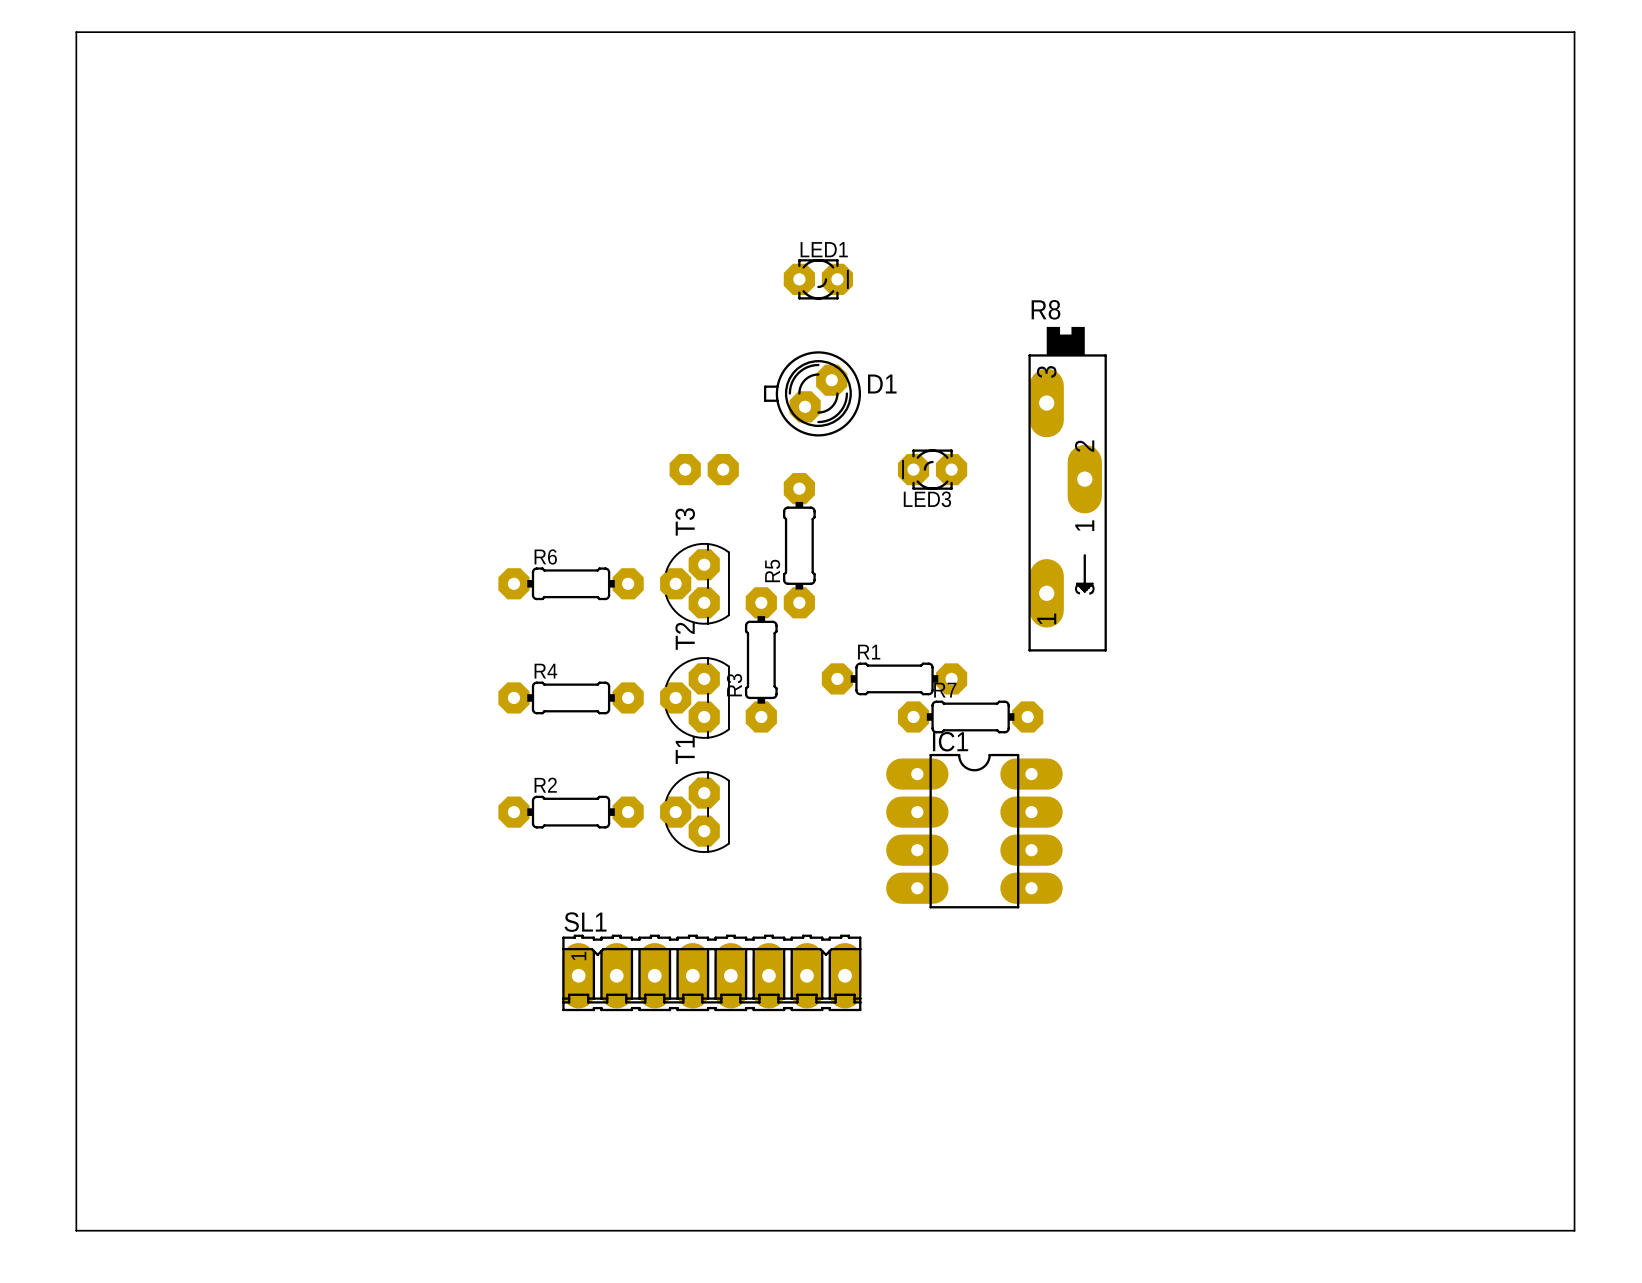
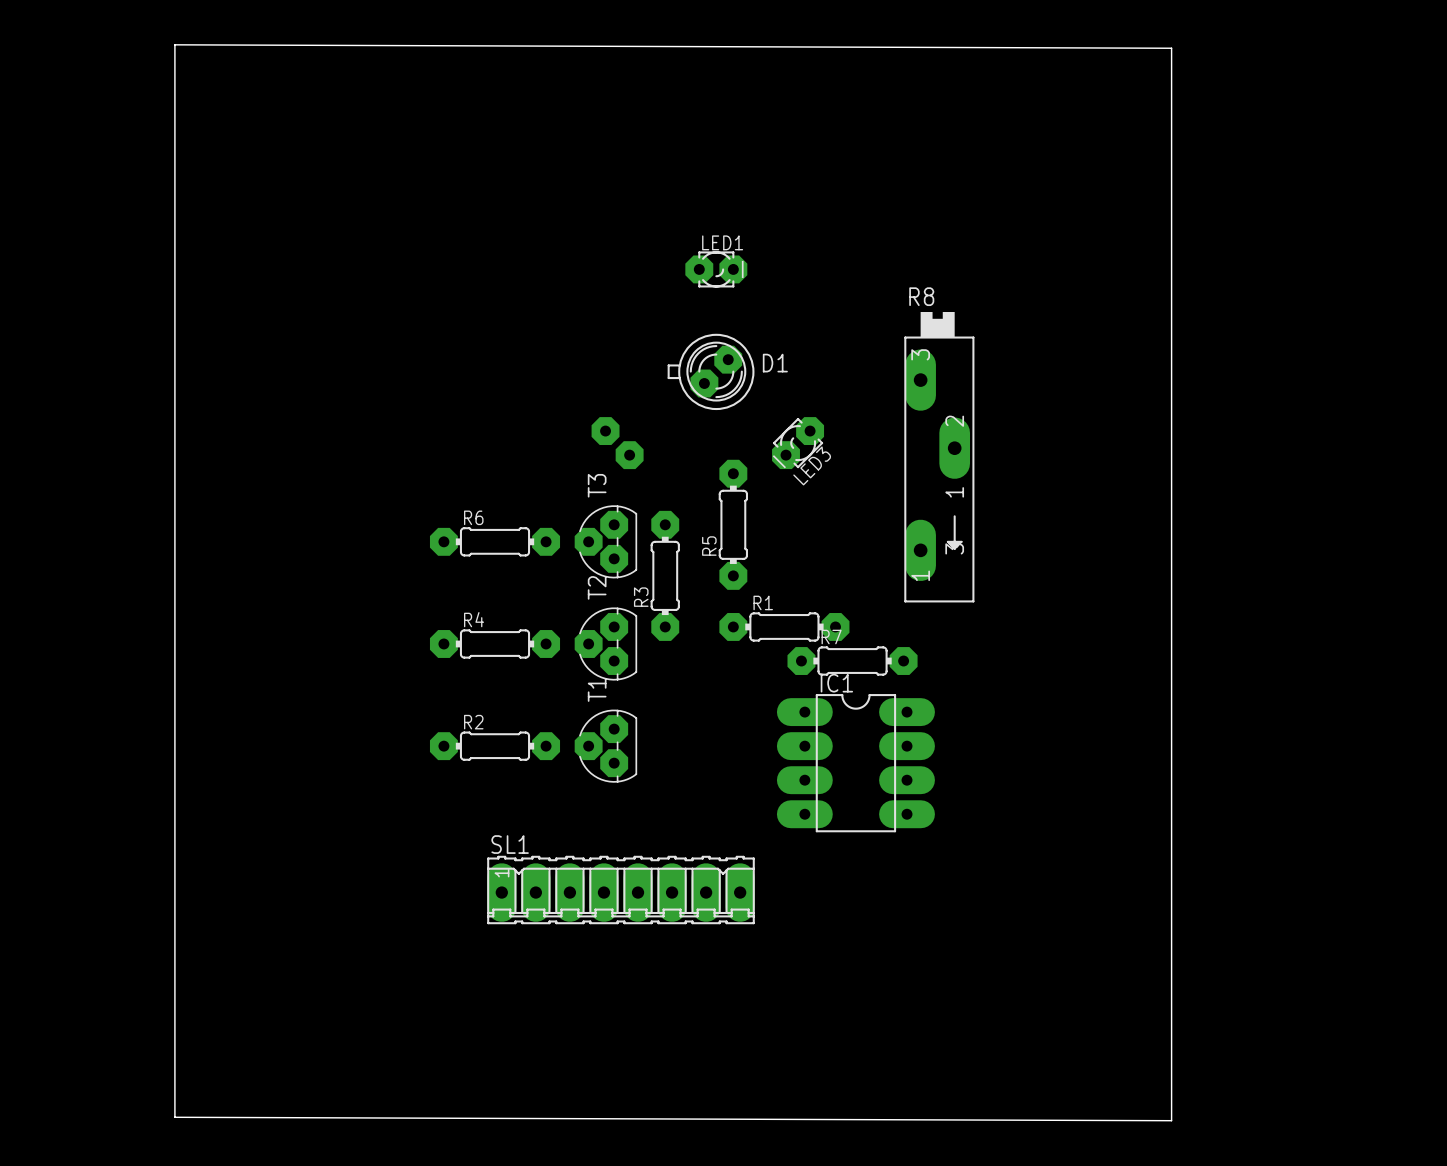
board edge: (76, 32) (1574, 32) (1574, 1230) (76, 1230) (76, 32) -> (174, 44) (174, 1117) (1171, 1120) (1171, 48) (174, 44)
part rotation: 0° (704, 469) -> 45° clockwise (617, 443)
LED3 rotation: 0° (932, 469) -> 45° counterclockwise (798, 443)
R5 position: (799, 545) -> (733, 524)
R3 position: (761, 659) -> (665, 575)

